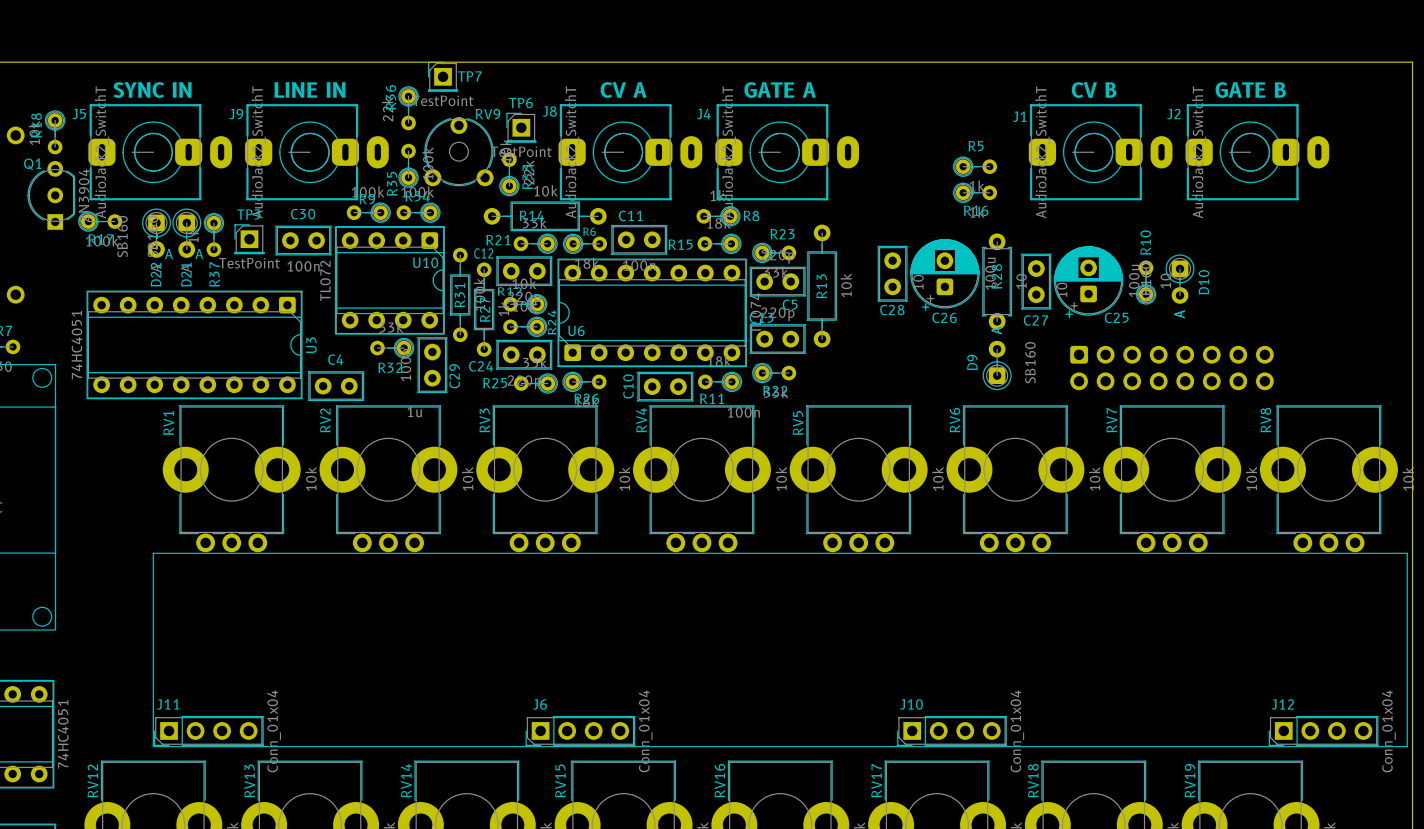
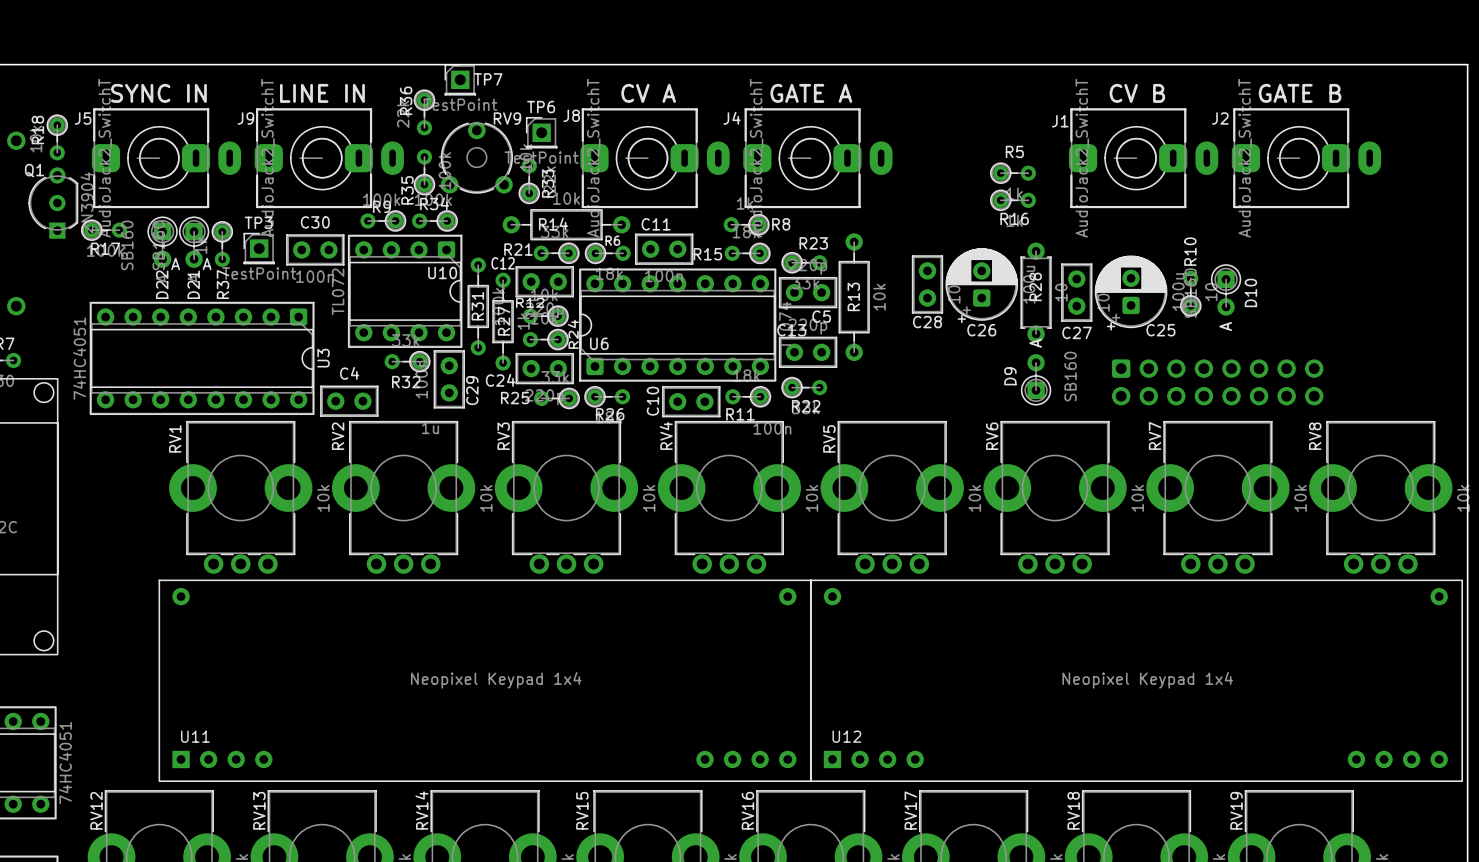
line: (153, 553) (1407, 553) (1407, 746) (153, 746) (153, 553) -> none
U11: none -> Neopixel Keypad 1x4 (485, 680)
U12: none -> Neopixel Keypad 1x4 (1136, 680)
J11: Conn_01x04 (208, 730) -> none
J6: Conn_01x04 (580, 730) -> none
J10: Conn_01x04 (952, 730) -> none
J12: Conn_01x04 (1323, 730) -> none

